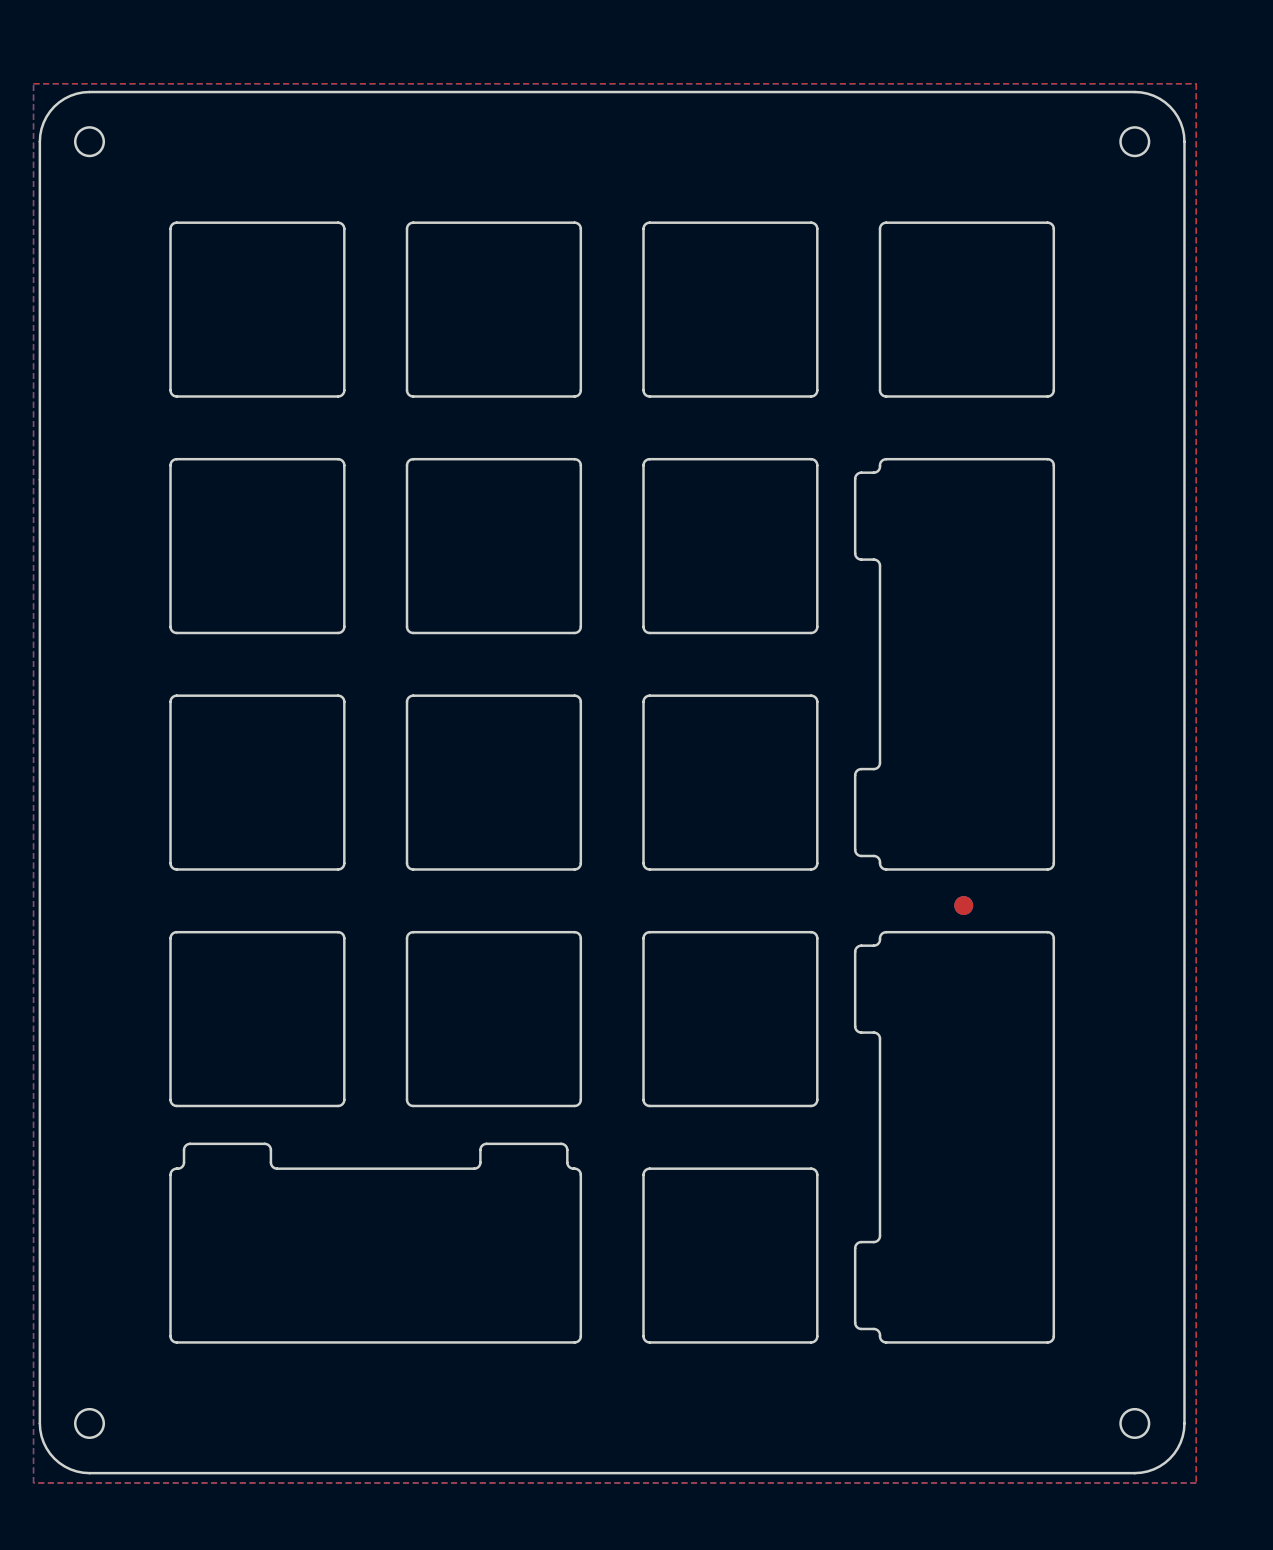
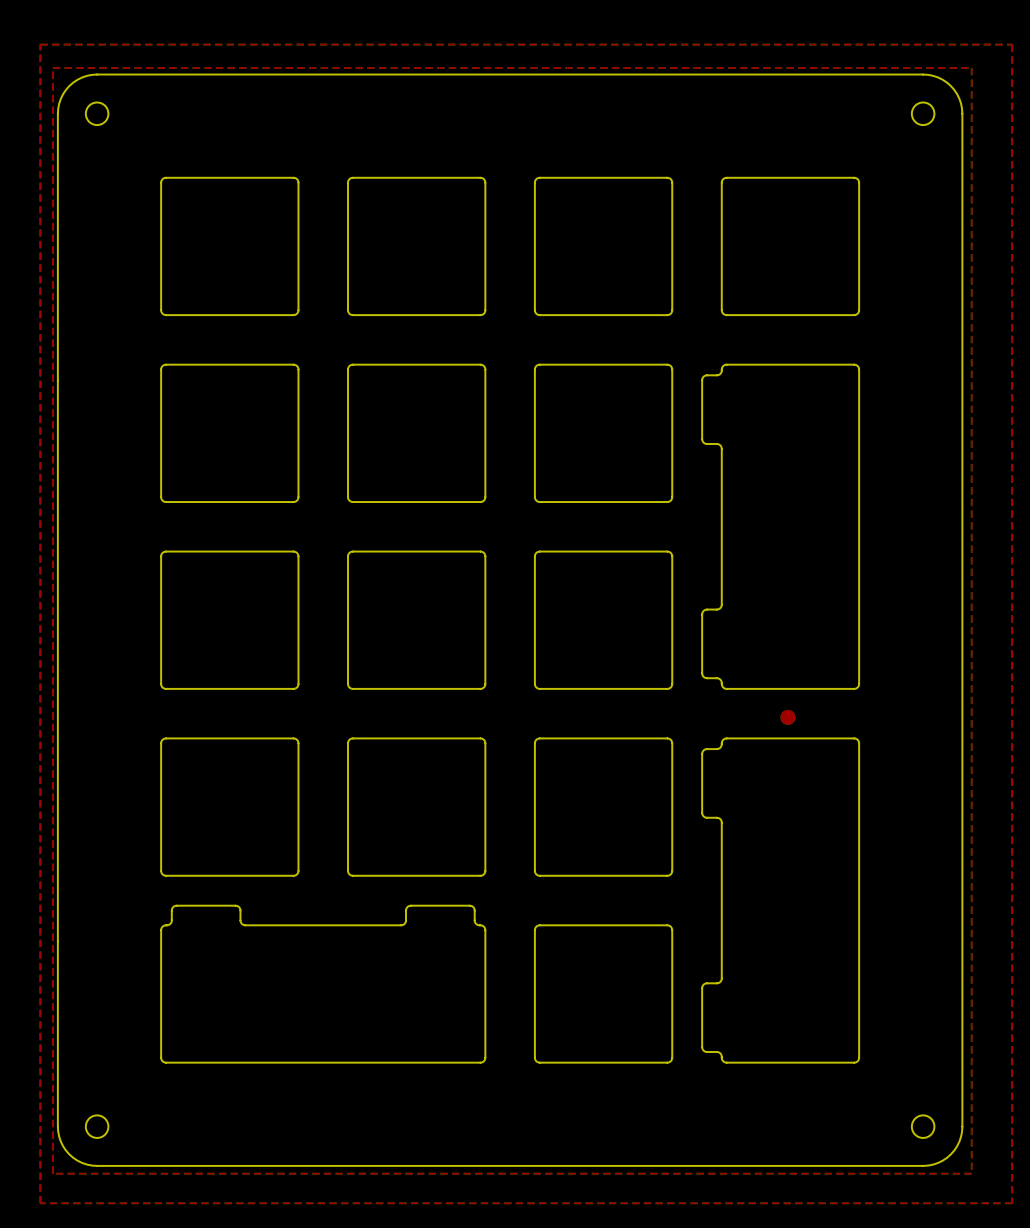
top zone outline: none -> (40, 44) (40, 1203) (1012, 1203) (1012, 44) (40, 44)

